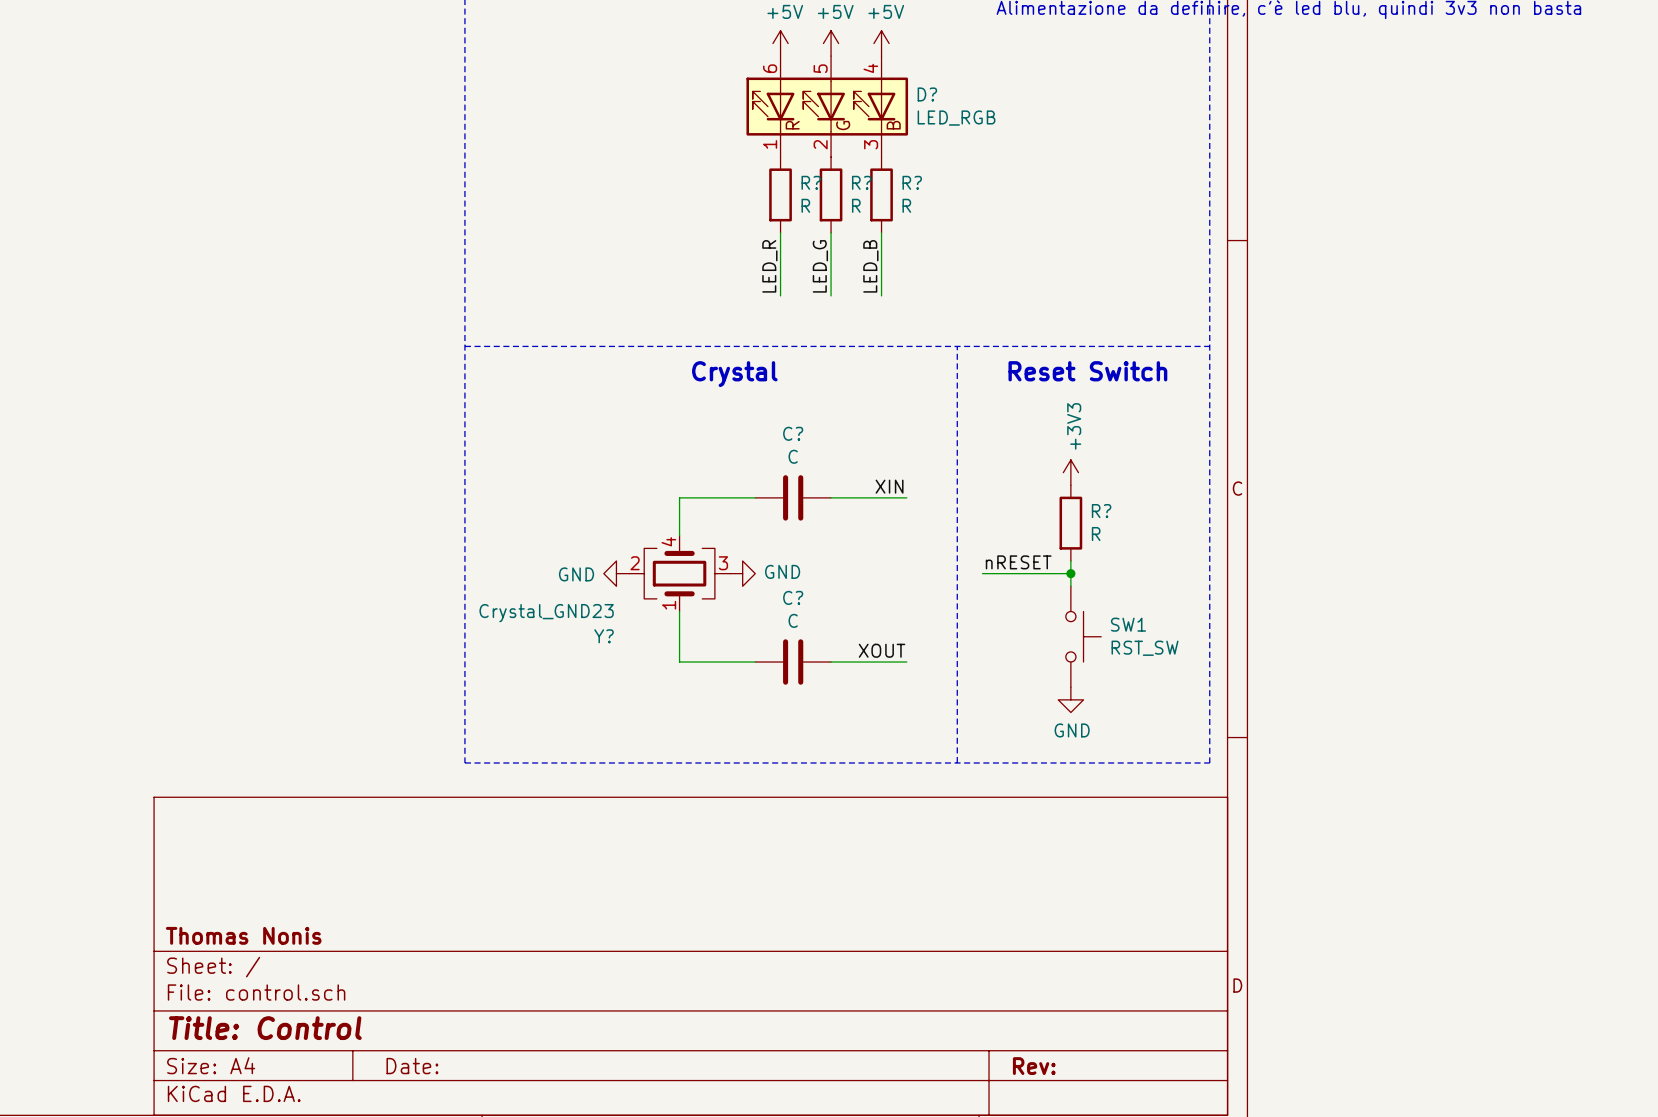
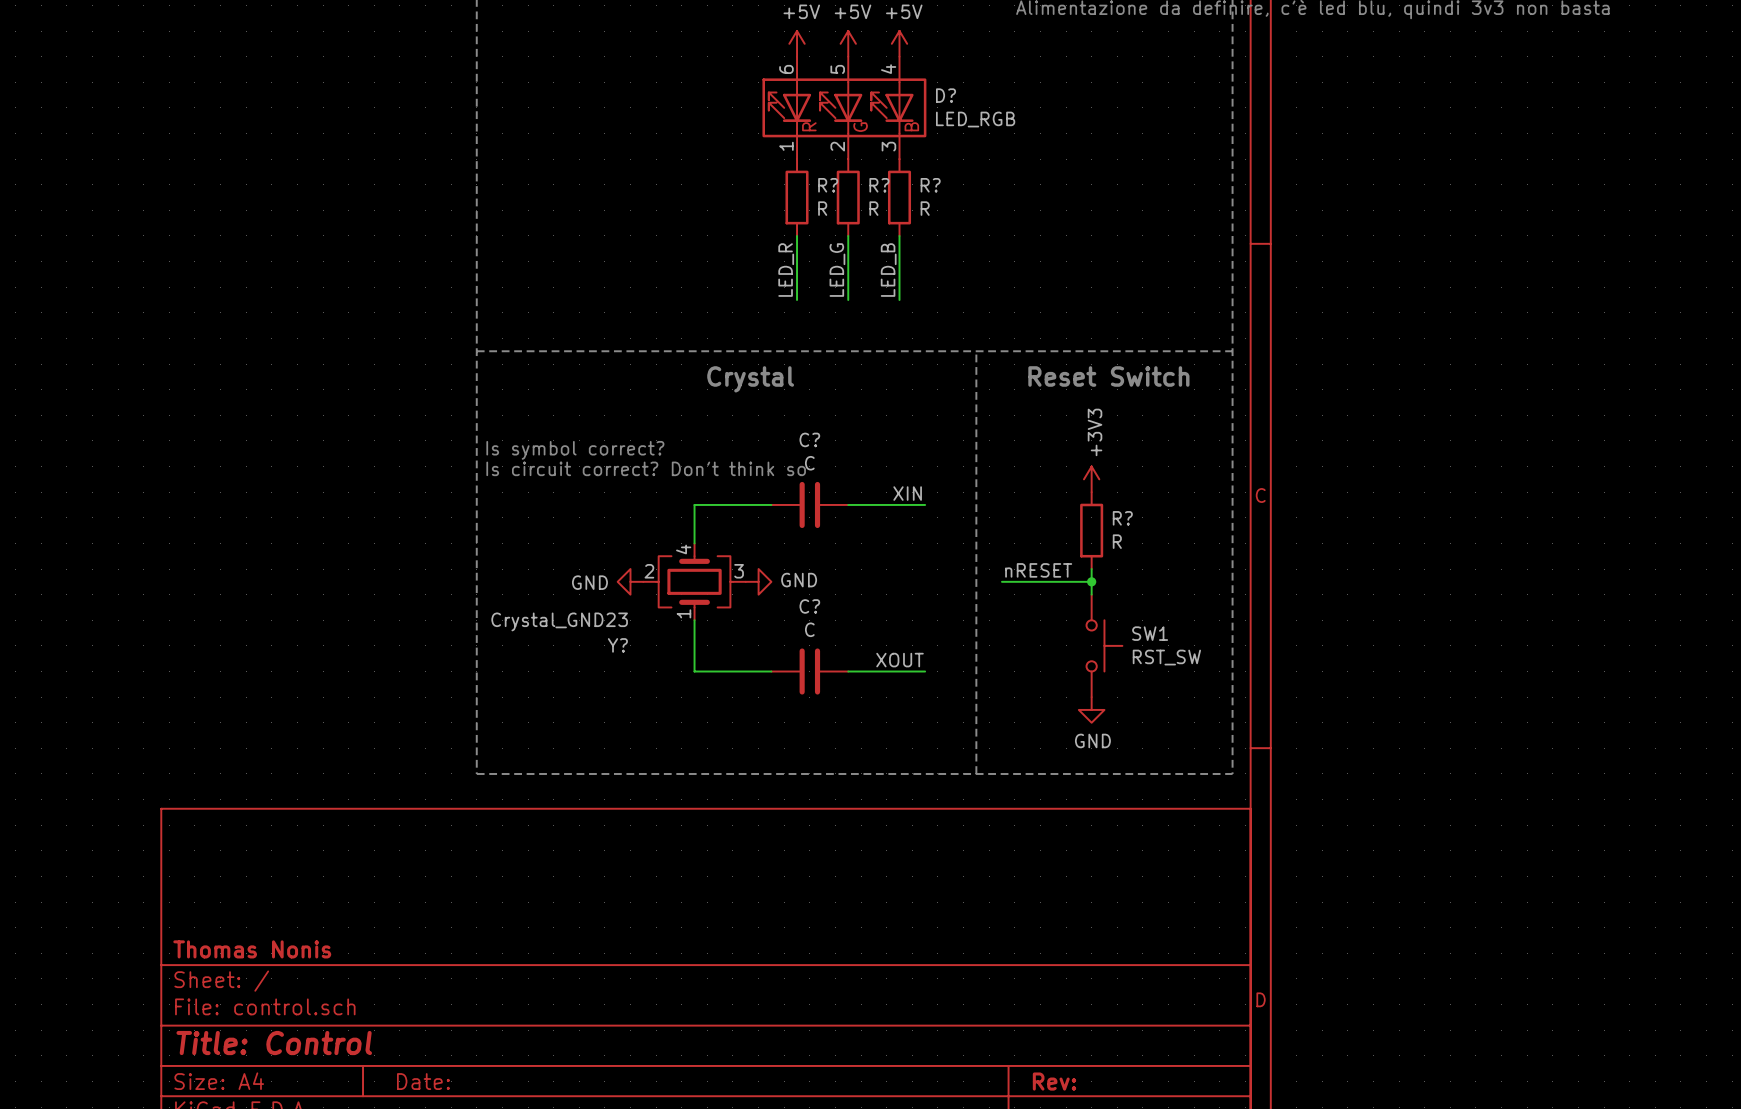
text: none -> Is symbol correct? (575, 450)
text: none -> Is circuit correct? Don't think so (646, 468)

